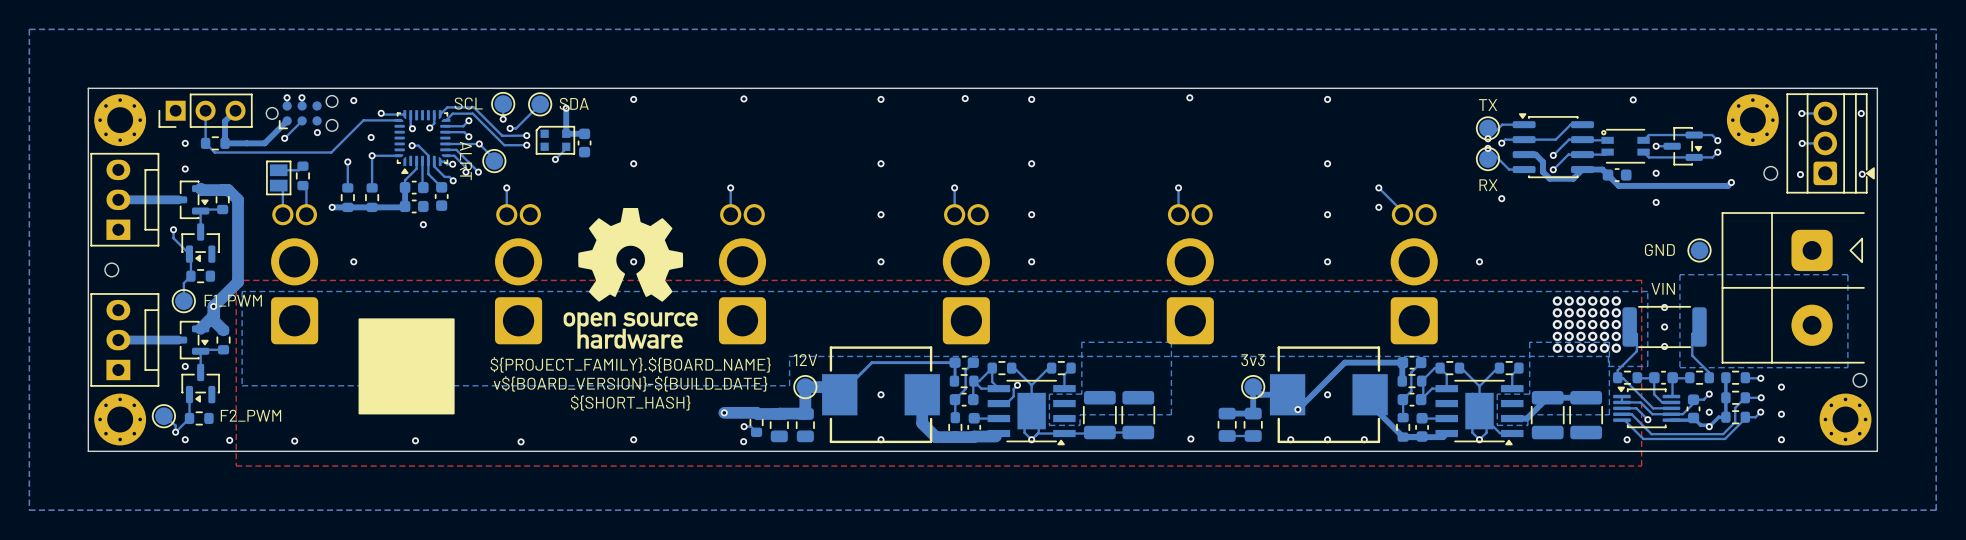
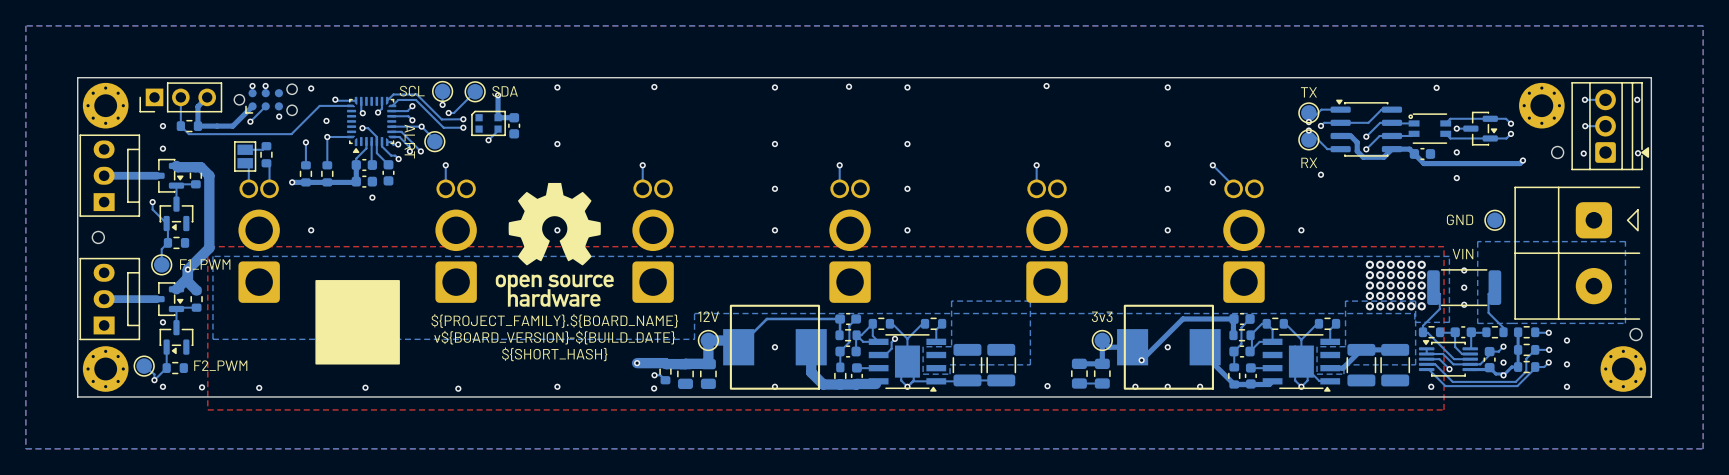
part footprint: [822, 346, 940, 444] -> [723, 304, 827, 390]
part footprint: [1269, 346, 1388, 444] -> [1117, 304, 1221, 390]

